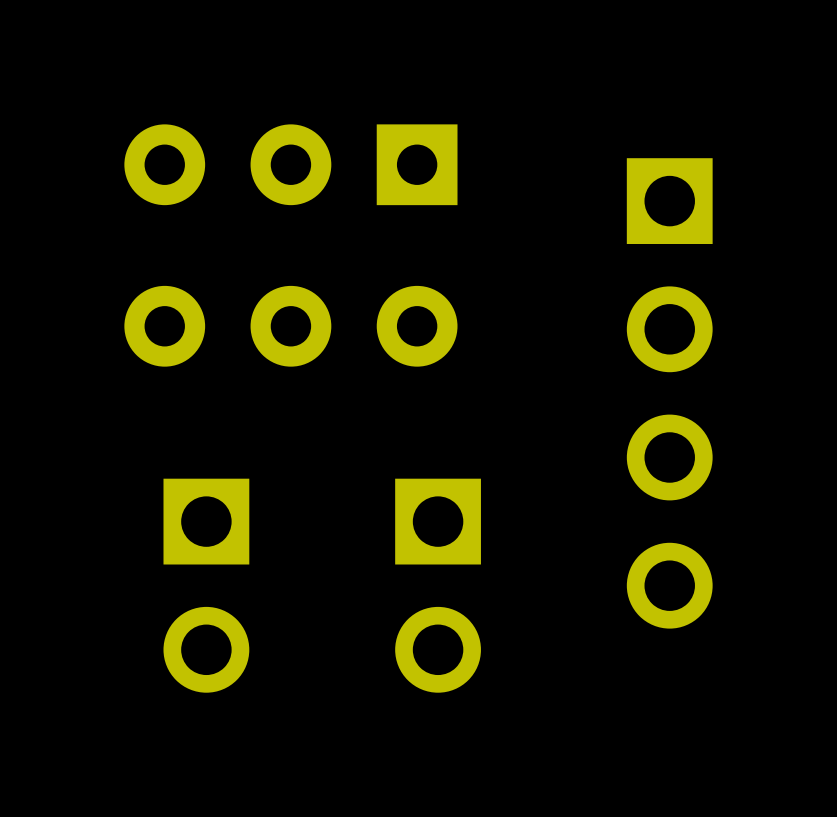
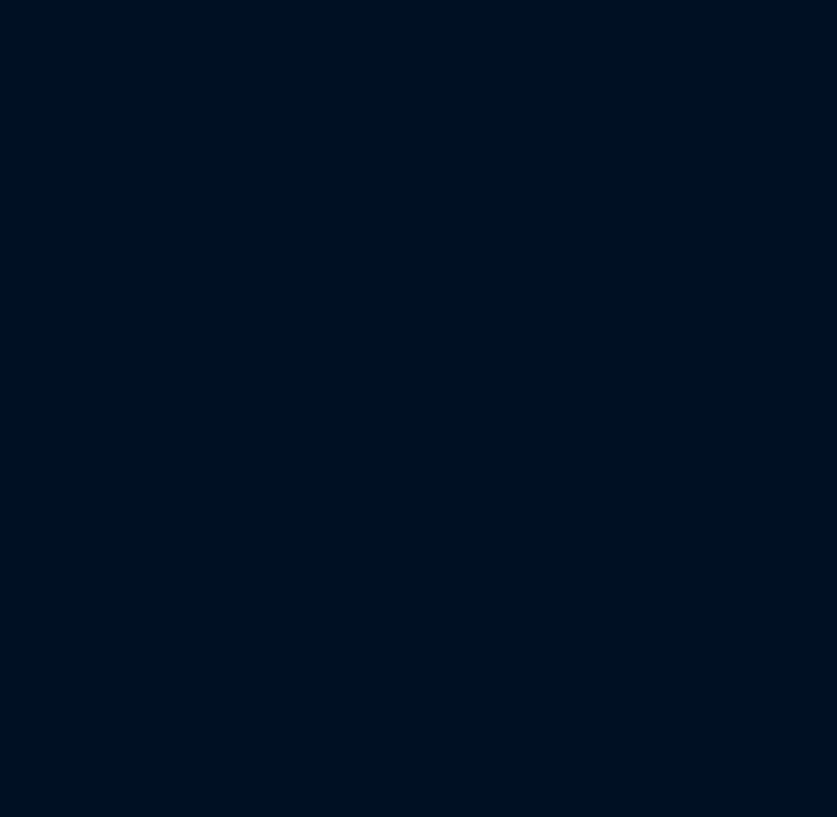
part: (290, 245) -> none
part: (669, 393) -> none
part: (206, 585) -> none
part: (438, 585) -> none

